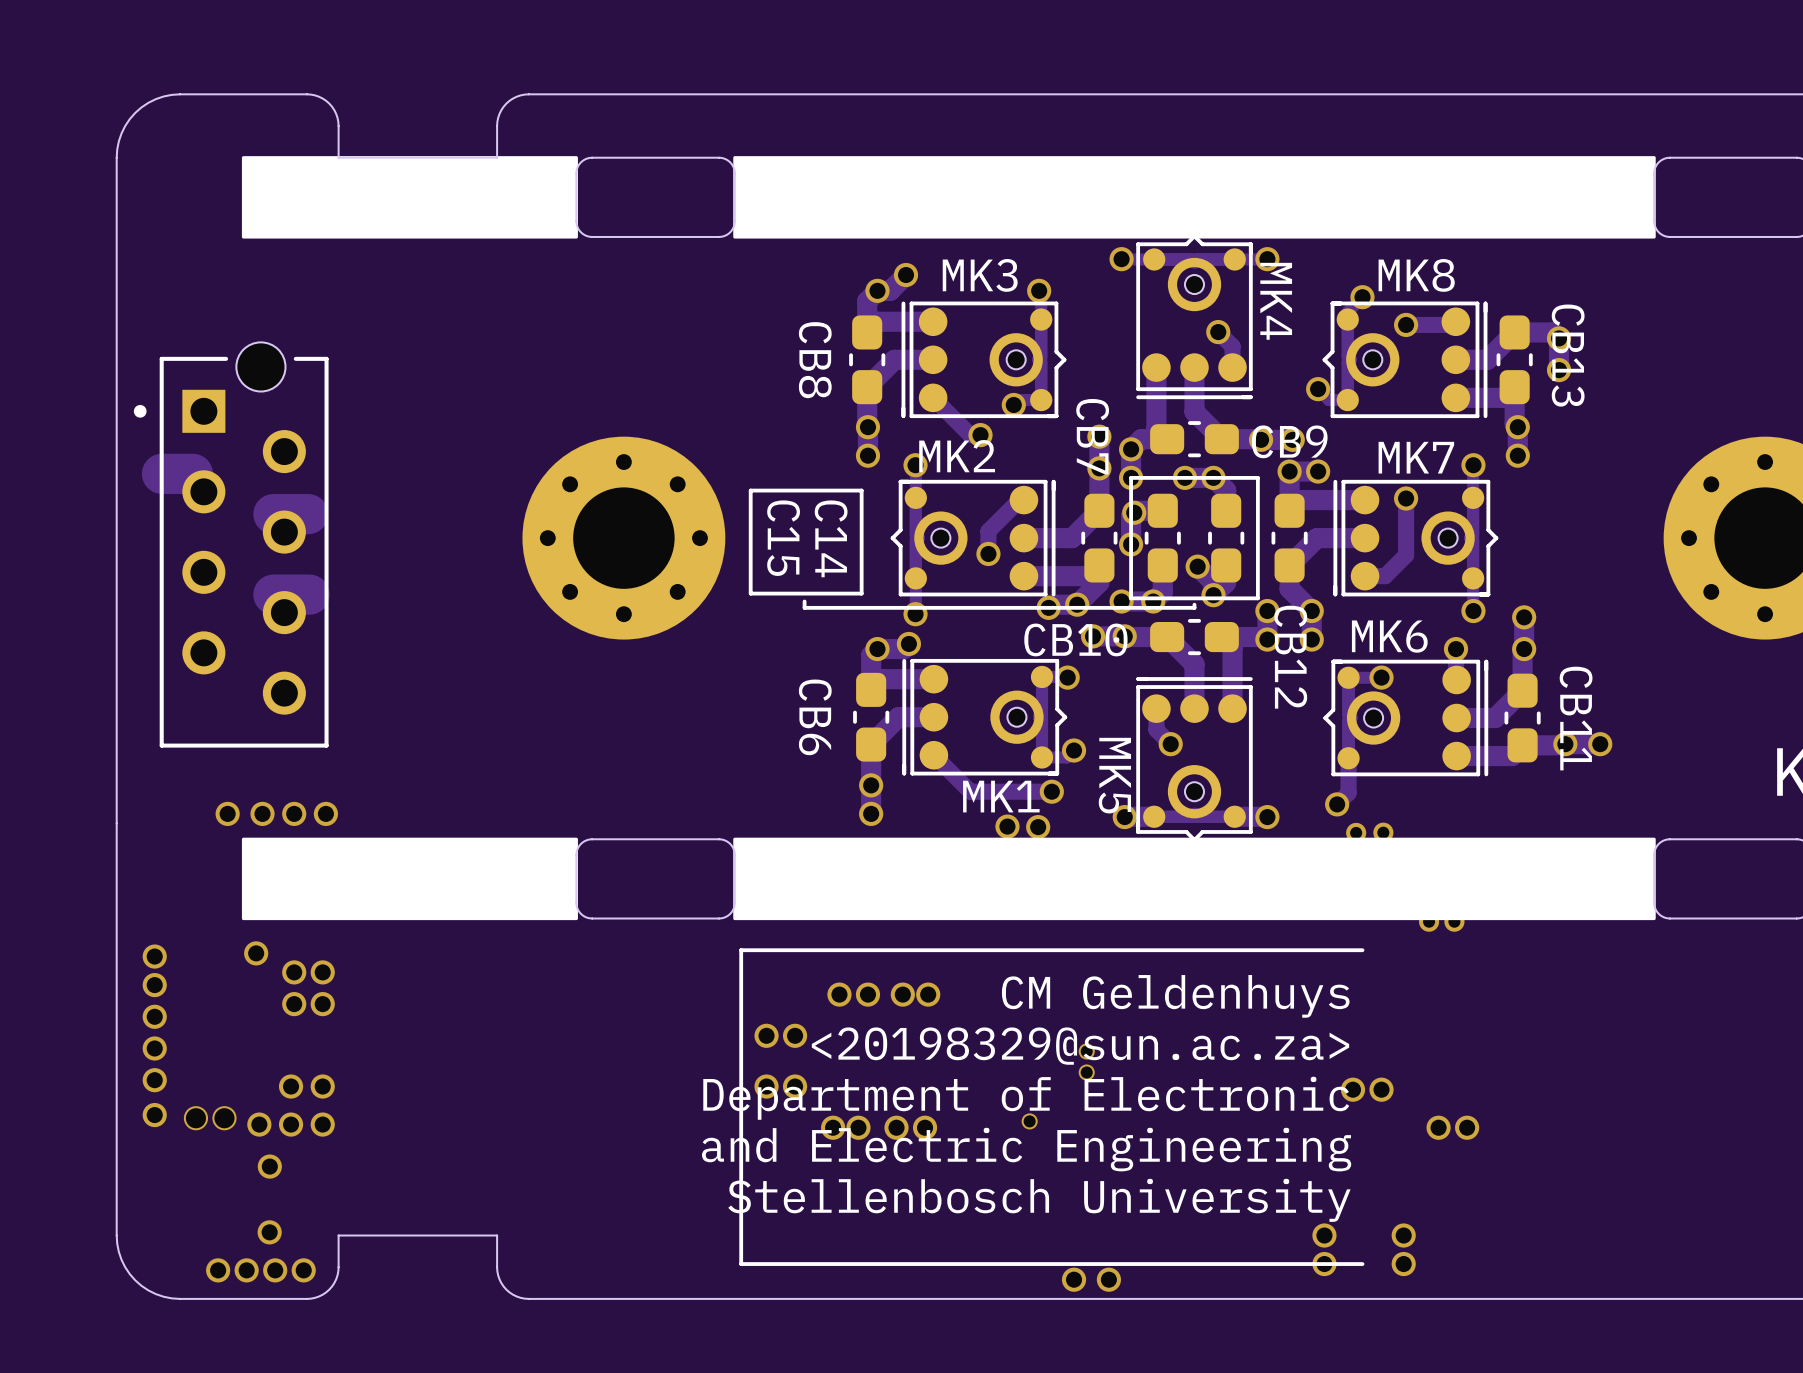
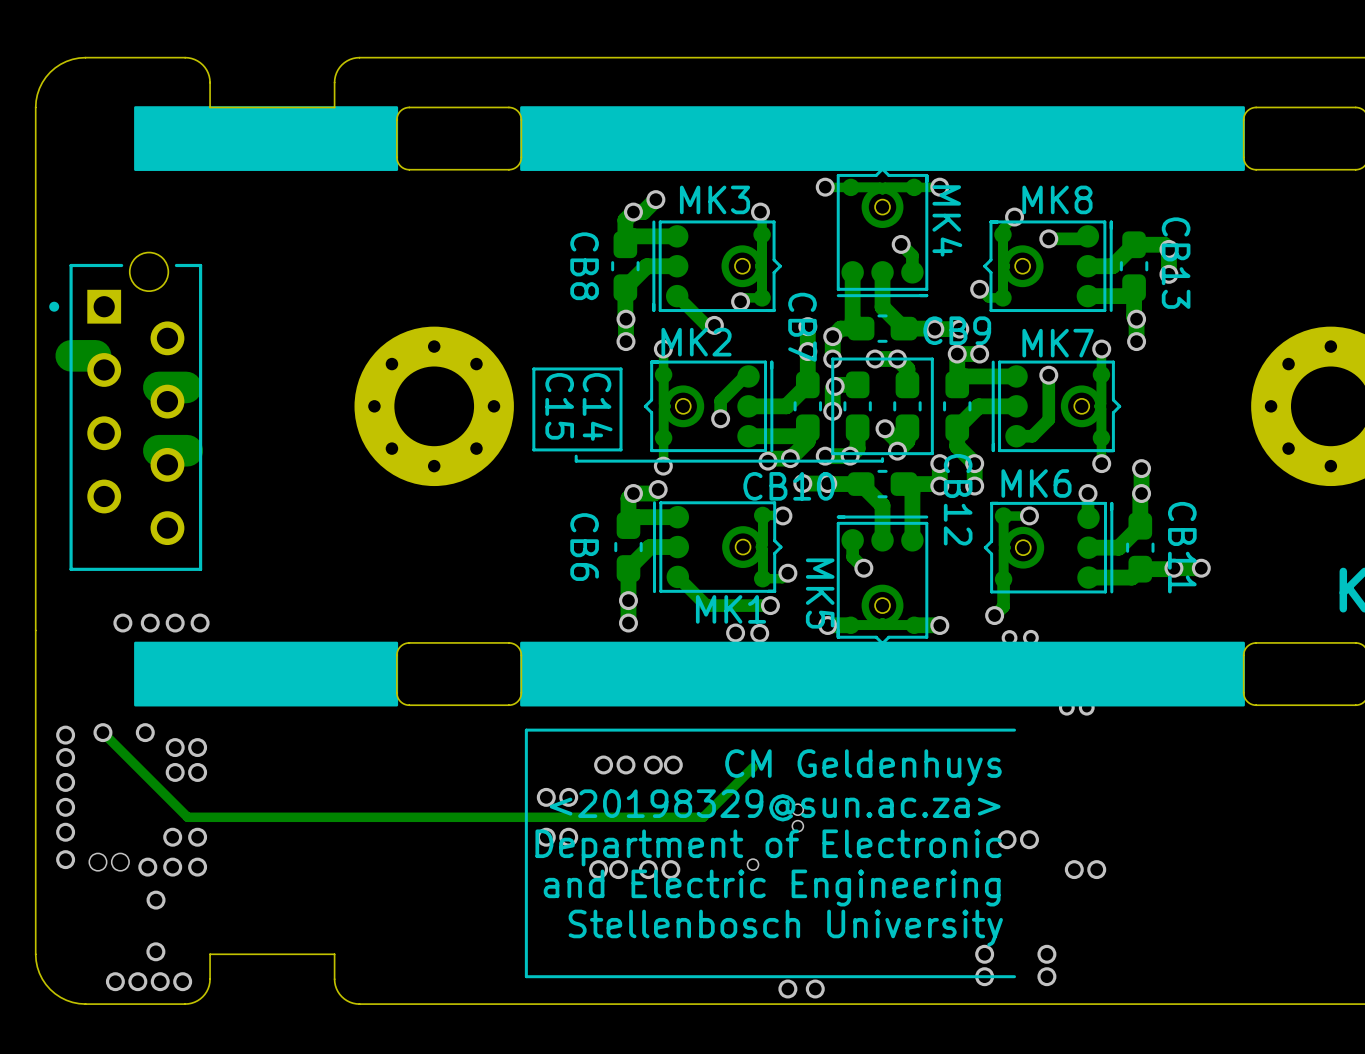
track: none -> (102, 732) (187, 817) (703, 817) (753, 767)
via: none -> (102, 732)

